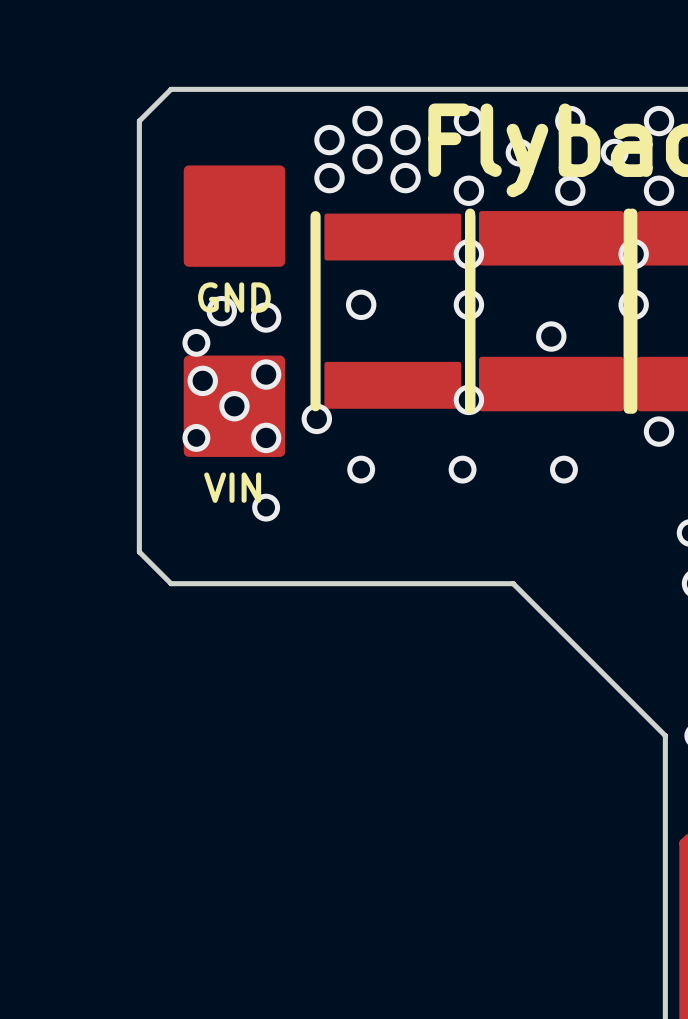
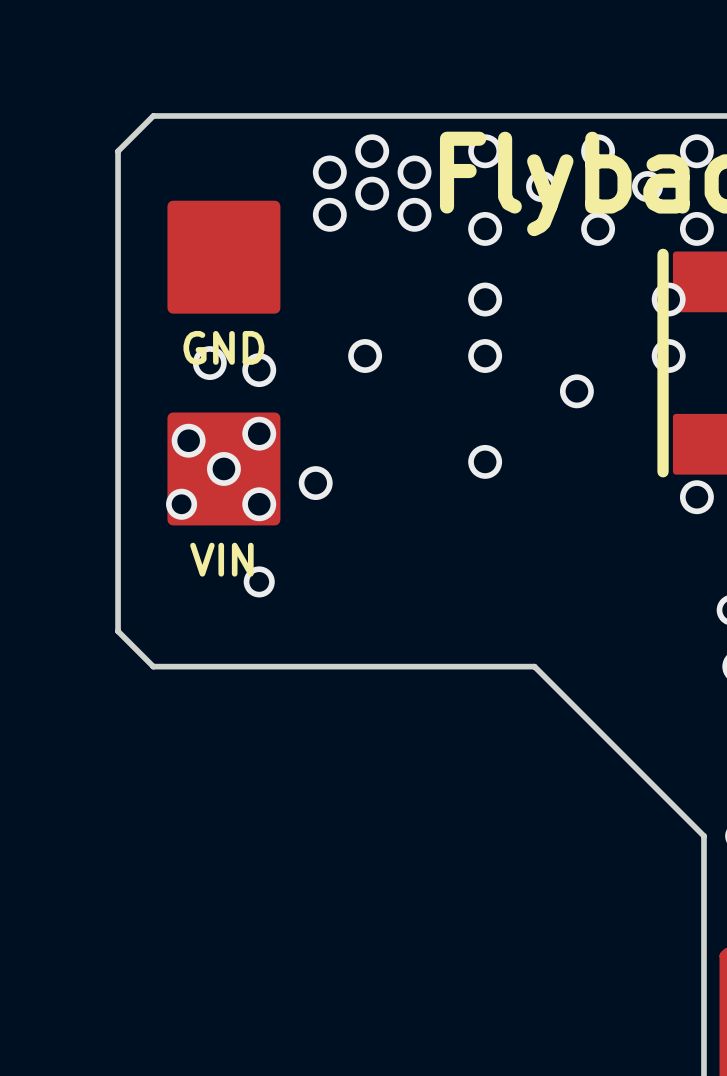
part: (392, 311) -> none
part: (551, 311) -> none
via: (196, 342) -> none
via: (361, 469) -> none
via: (462, 469) -> none
via: (563, 469) -> none

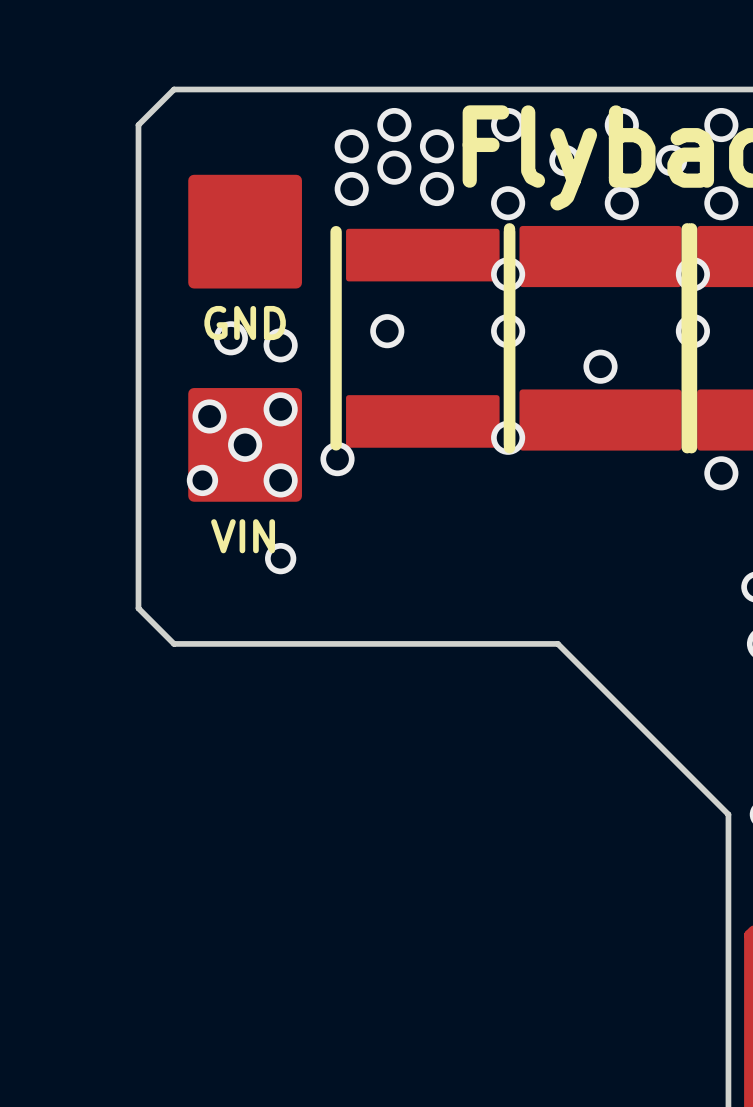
part: none -> (422, 338)
part: none -> (600, 338)

